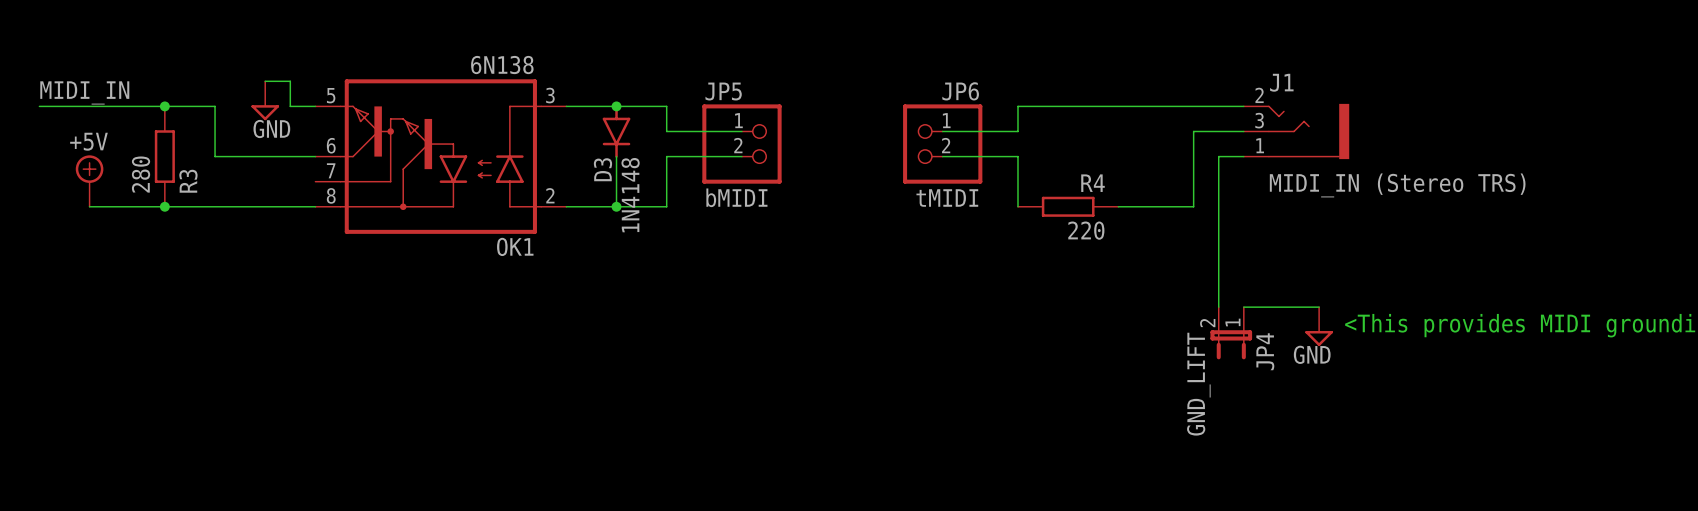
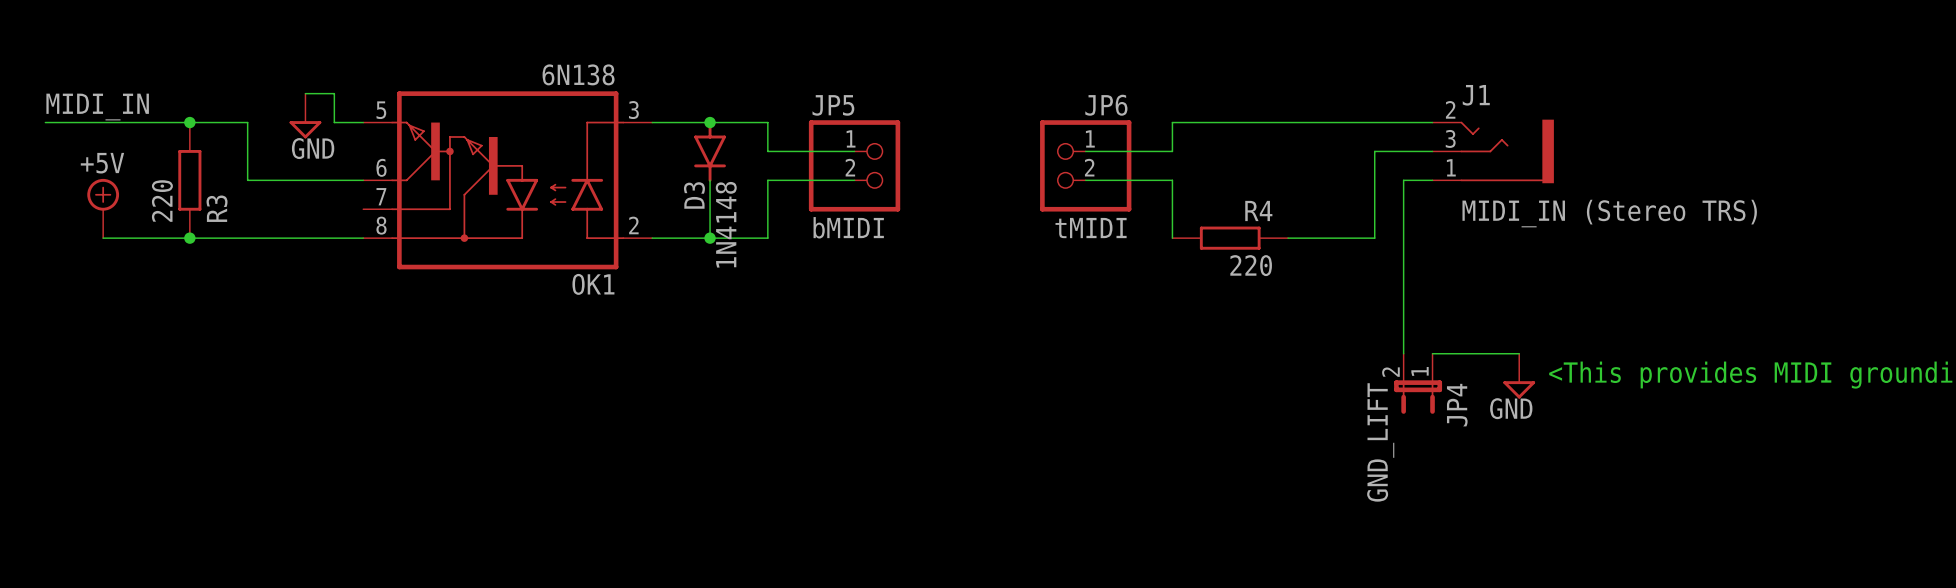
R3 value: 280 (141, 174) -> 220 (162, 201)

